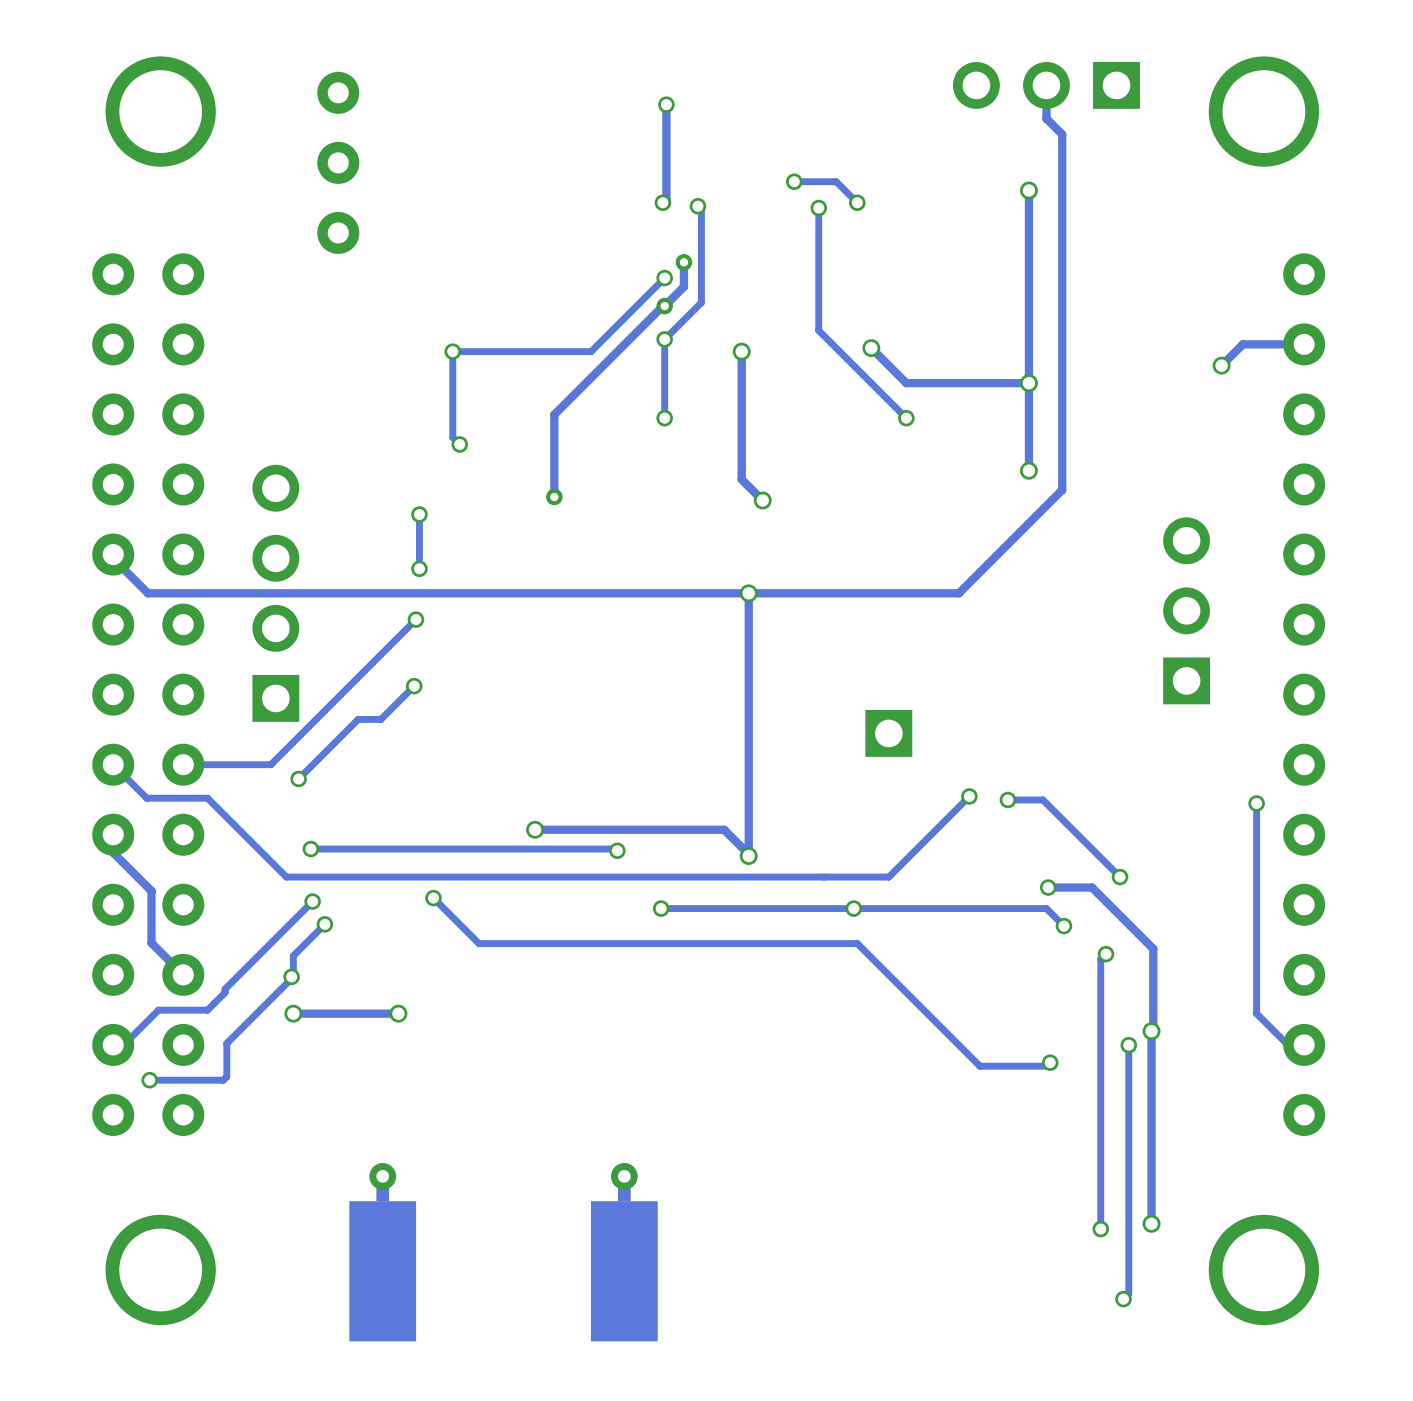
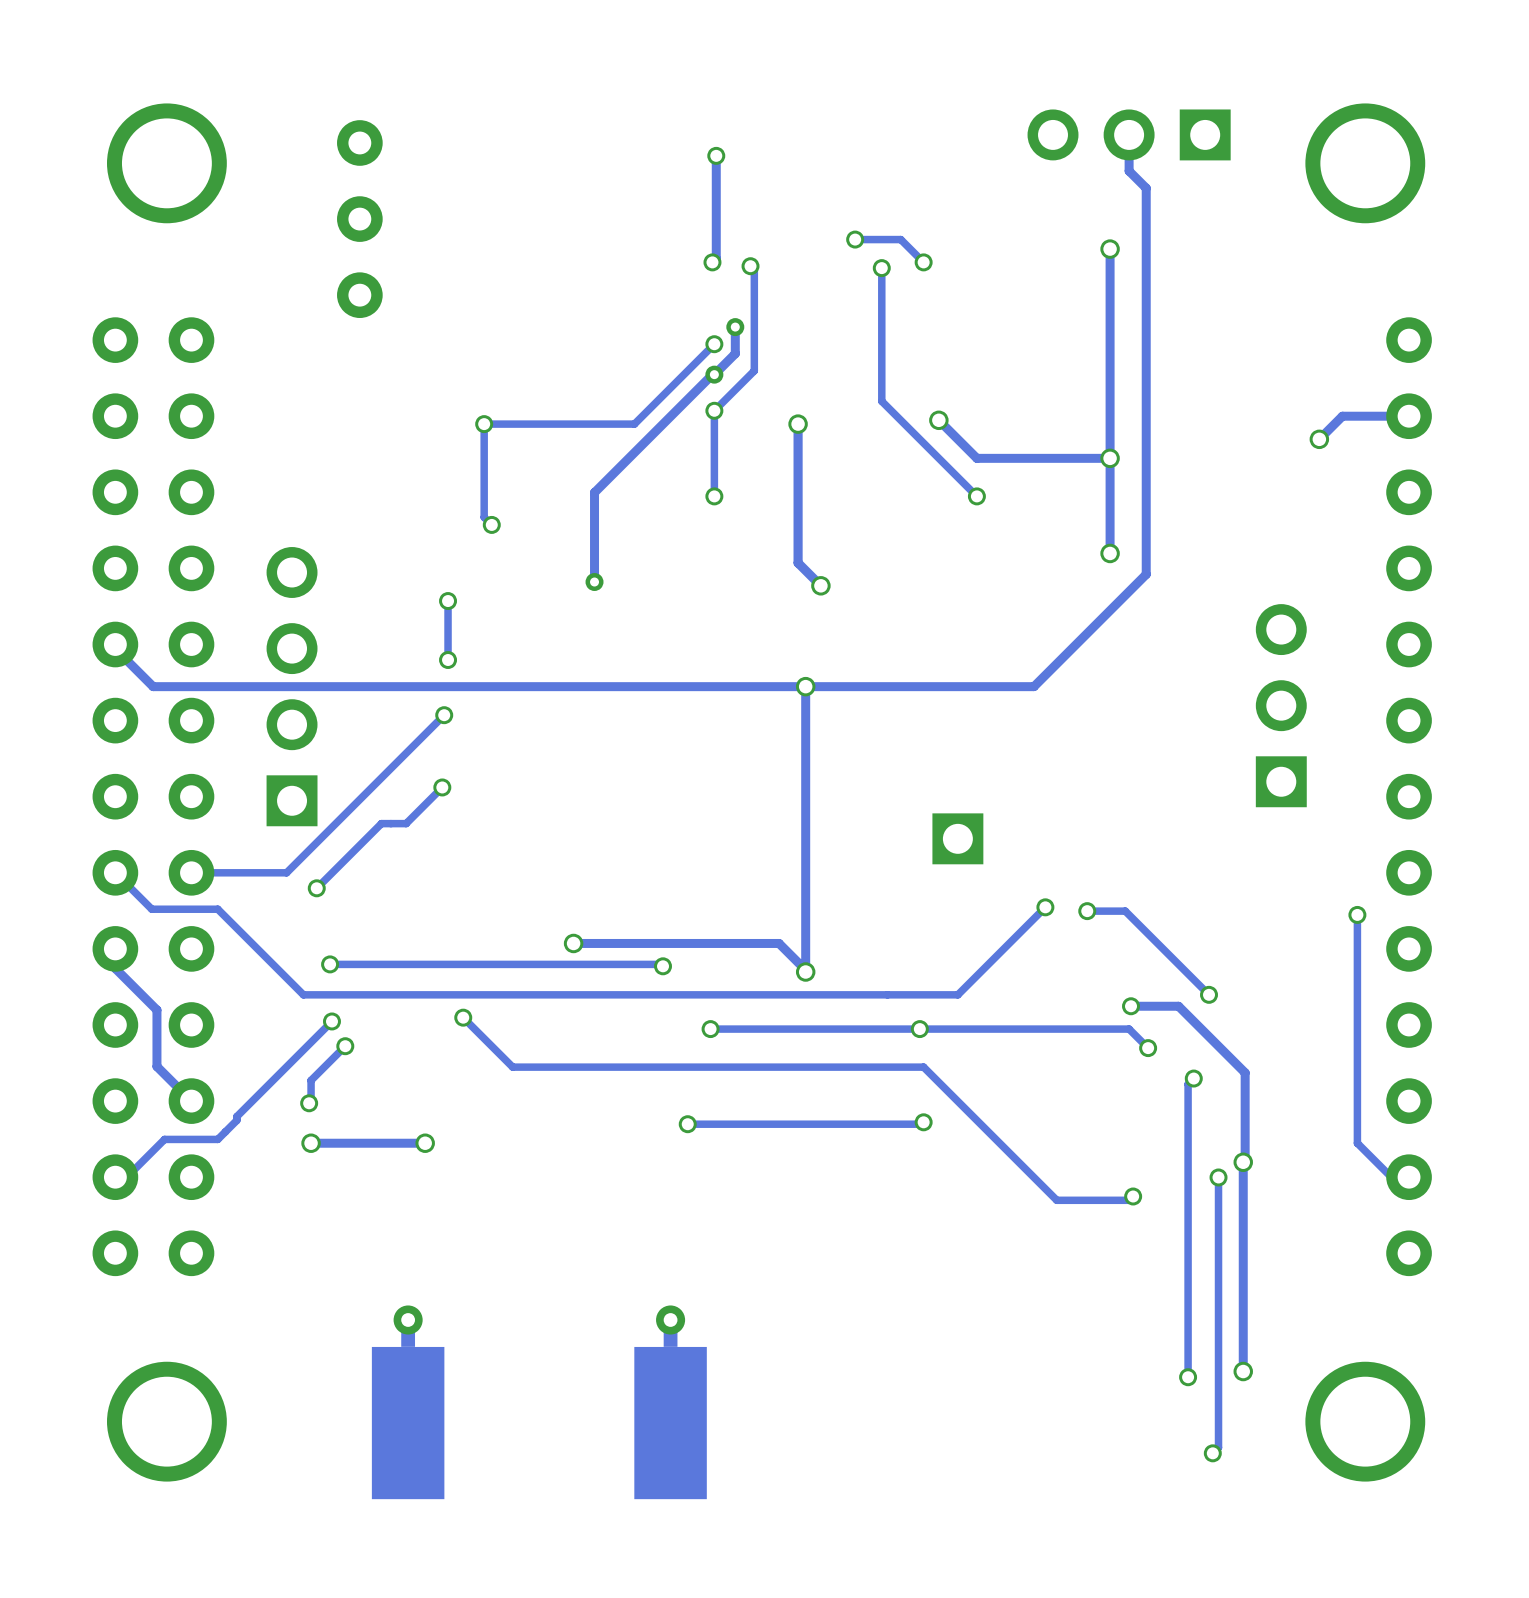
track: (291, 976) (226, 1043) (226, 1076) (223, 1080) (149, 1080) -> none
track: none -> (923, 1122) (921, 1124) (687, 1124)
via: none -> (923, 1122)
via: none -> (687, 1124)
via: (149, 1080) -> none

